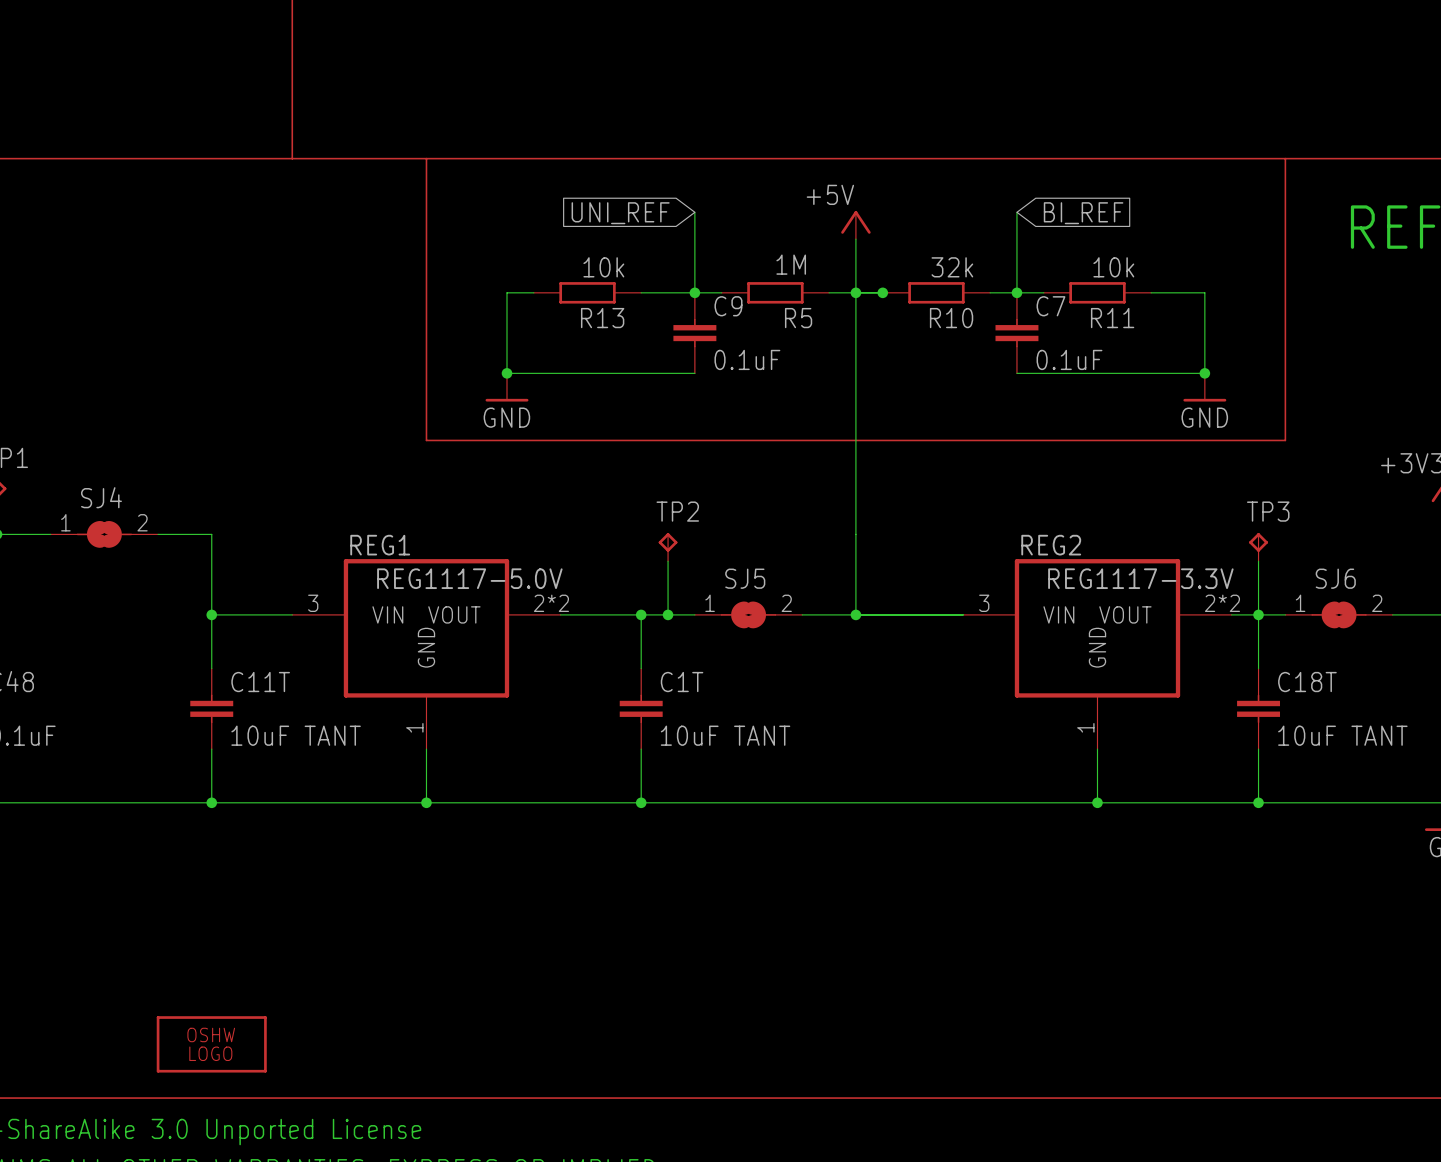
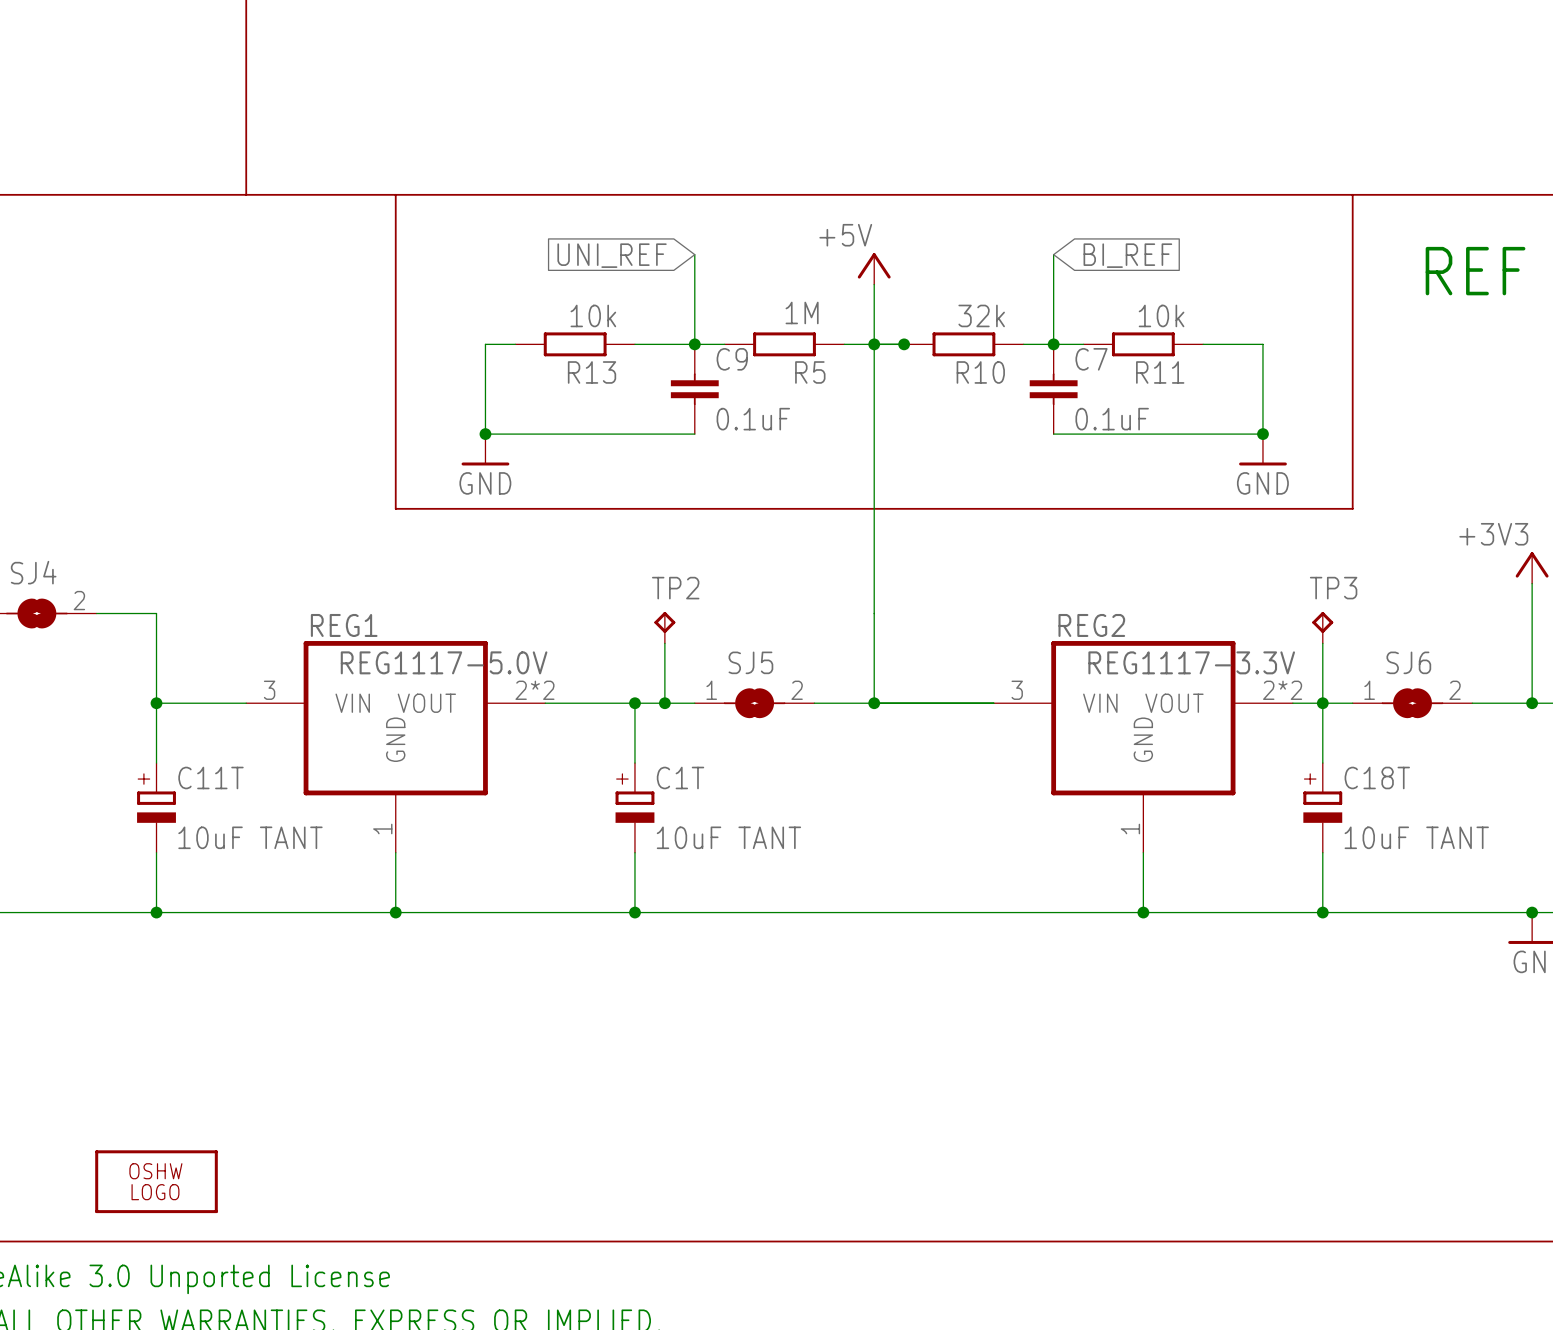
C11T symbol: [190, 668, 234, 750] -> [137, 763, 176, 853]
C1T symbol: [619, 668, 663, 750] -> [615, 763, 655, 853]
C18T symbol: [1237, 668, 1281, 750] -> [1303, 763, 1343, 853]

